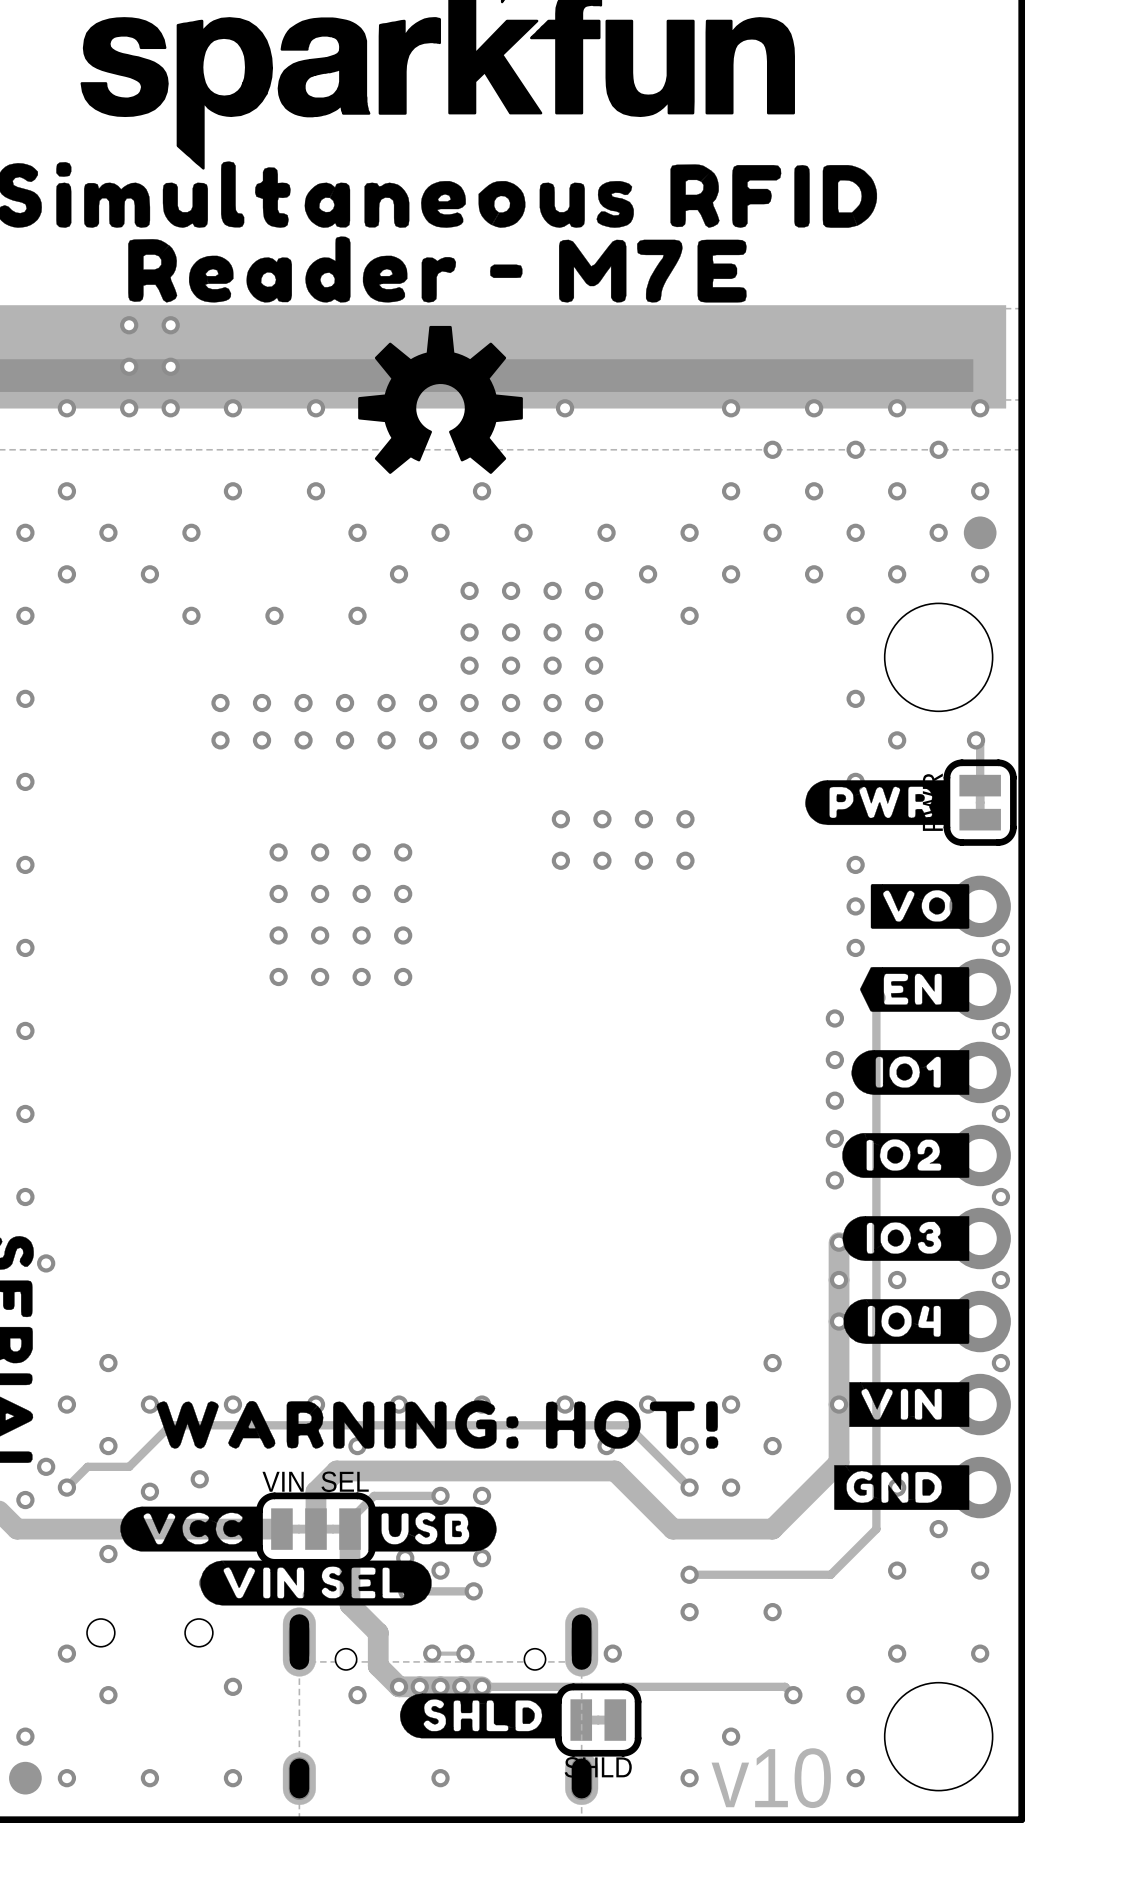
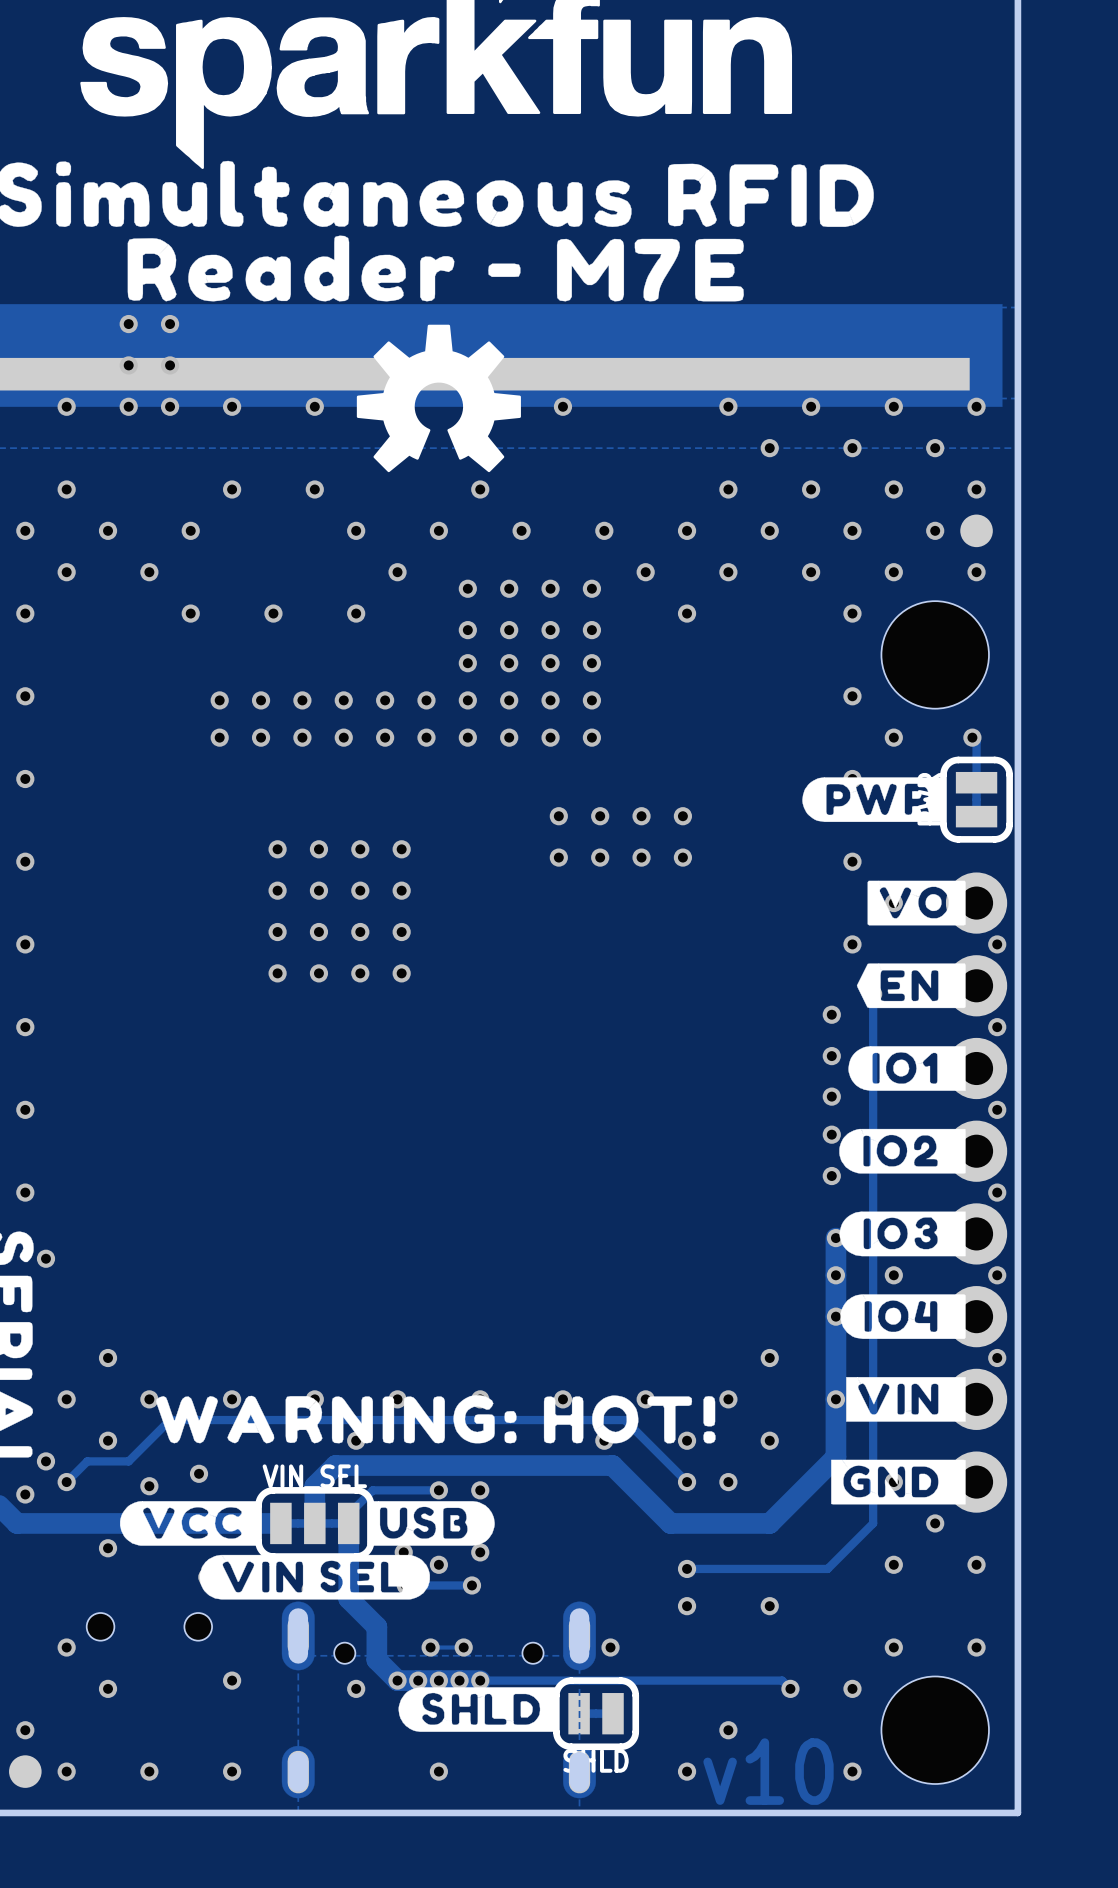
via position: (855, 906) -> (893, 903)

